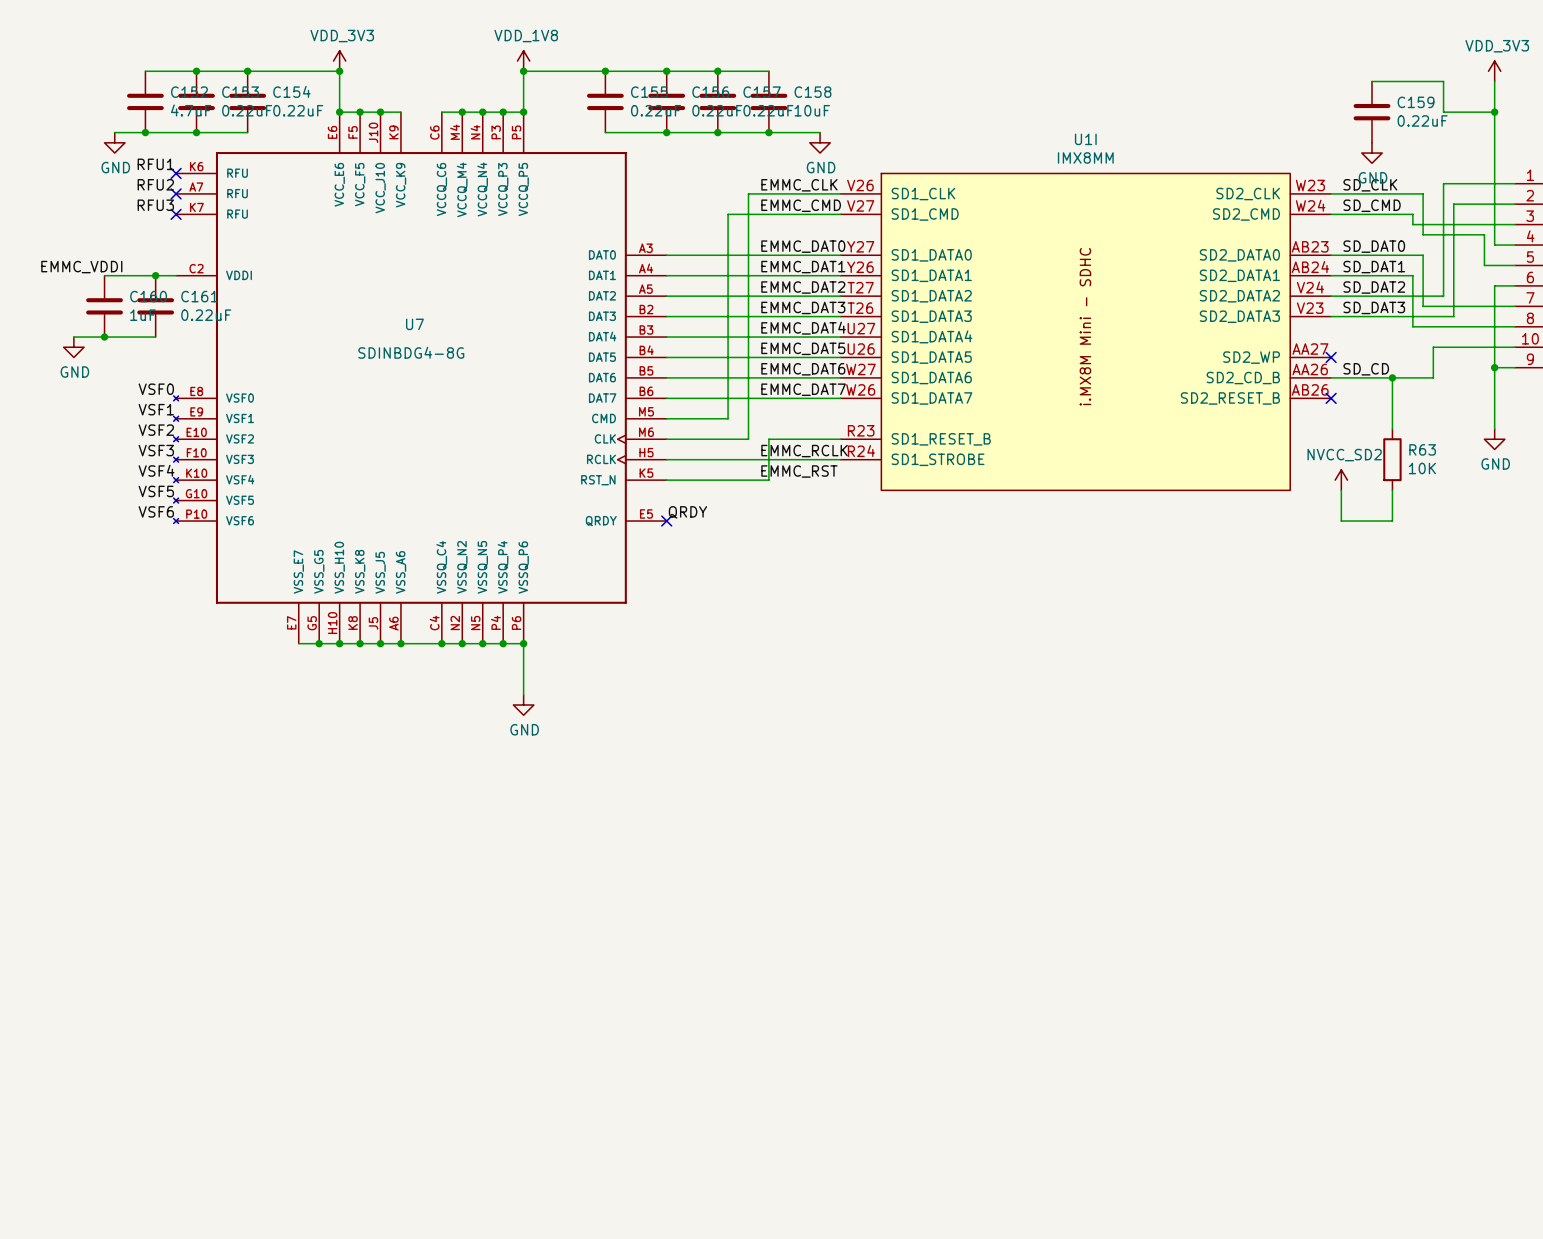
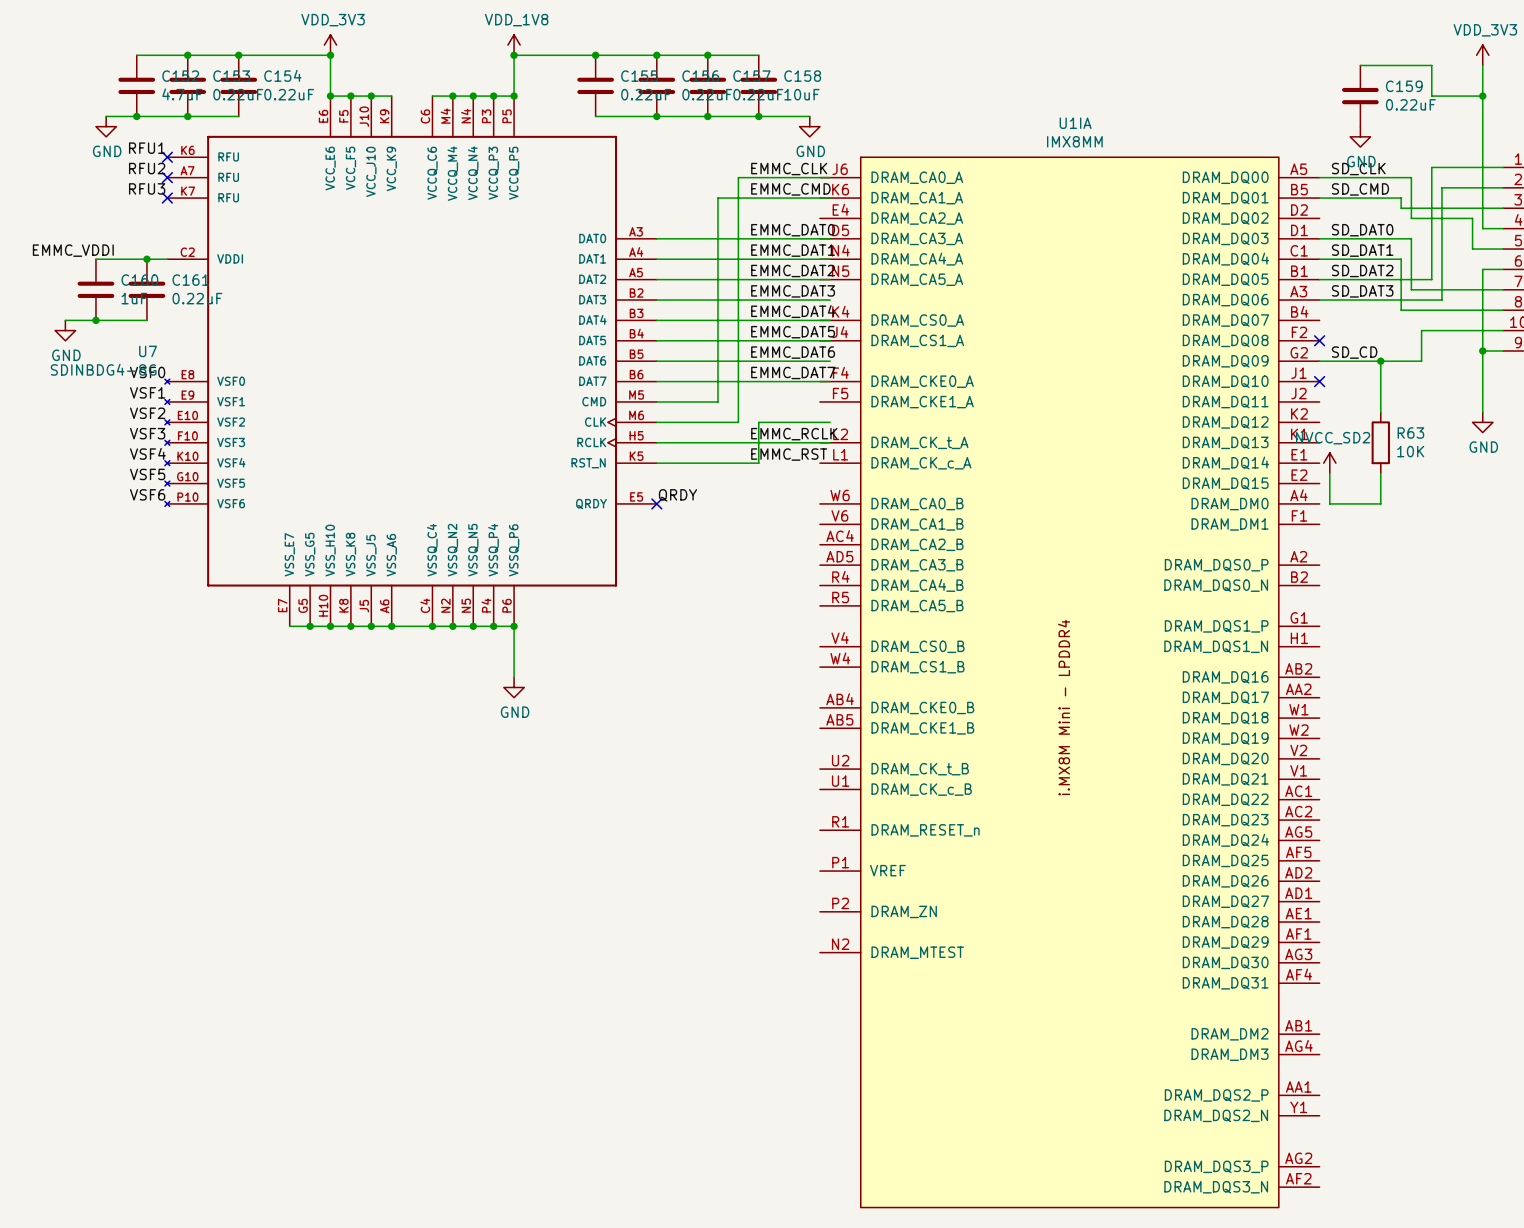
U7 name position: U7 (414, 324) -> U7 (148, 351)
U1I: IMX8MM (1085, 331) -> none
U7 value position: SDINBDG4-8G (411, 352) -> SDINBDG4-8G (103, 369)
U1IA: none -> IMX8MM (1069, 682)

